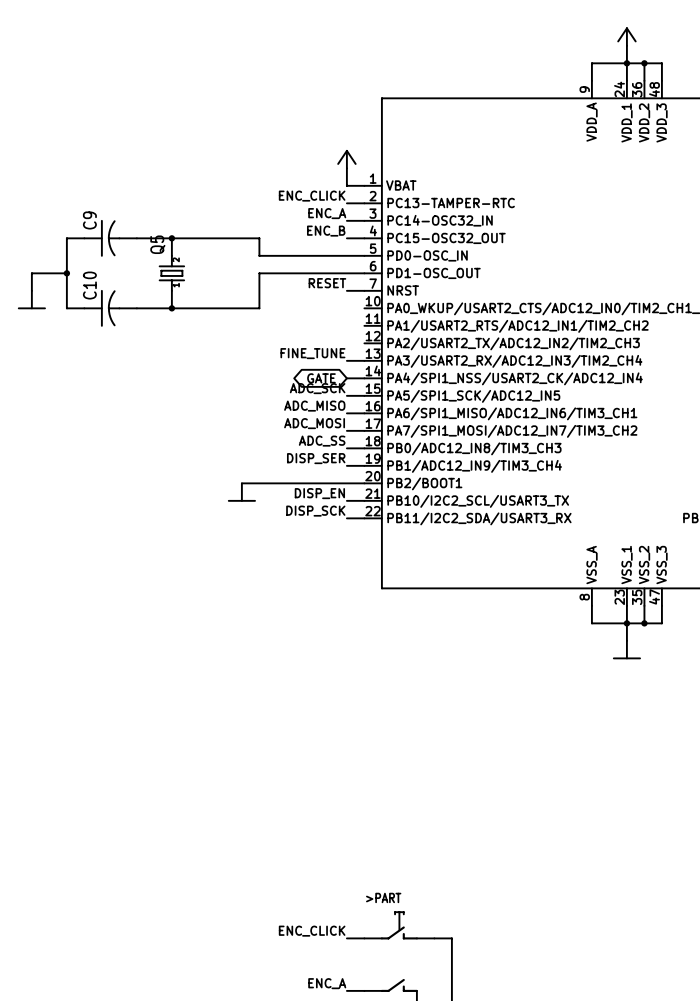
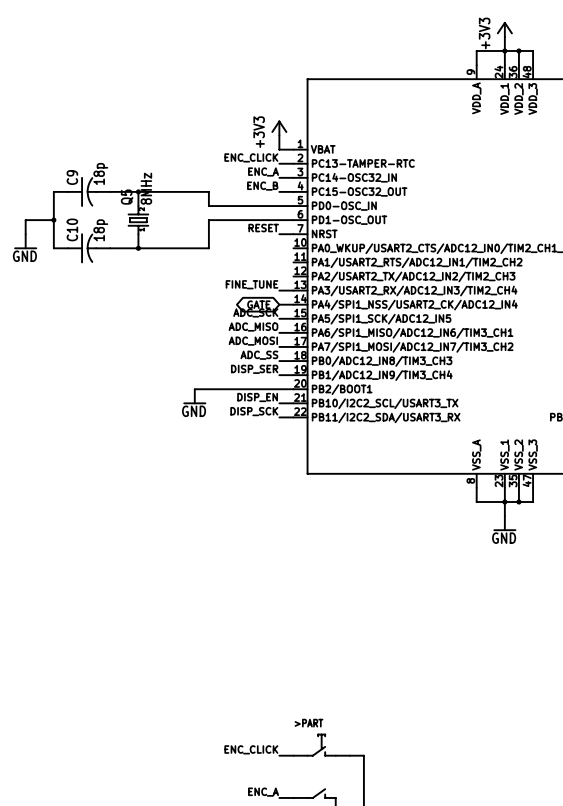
power symbol text: none -> +3V3 (484, 33)
power symbol text: none -> +3V3 (259, 132)
C9 value: none -> 18p (100, 173)
Q5 value: none -> 8MHz (146, 188)
C10 value: none -> 18p (100, 230)
power symbol text: none -> GND (24, 256)
power symbol text: none -> GND (194, 411)
power symbol text: none -> GND (504, 538)

